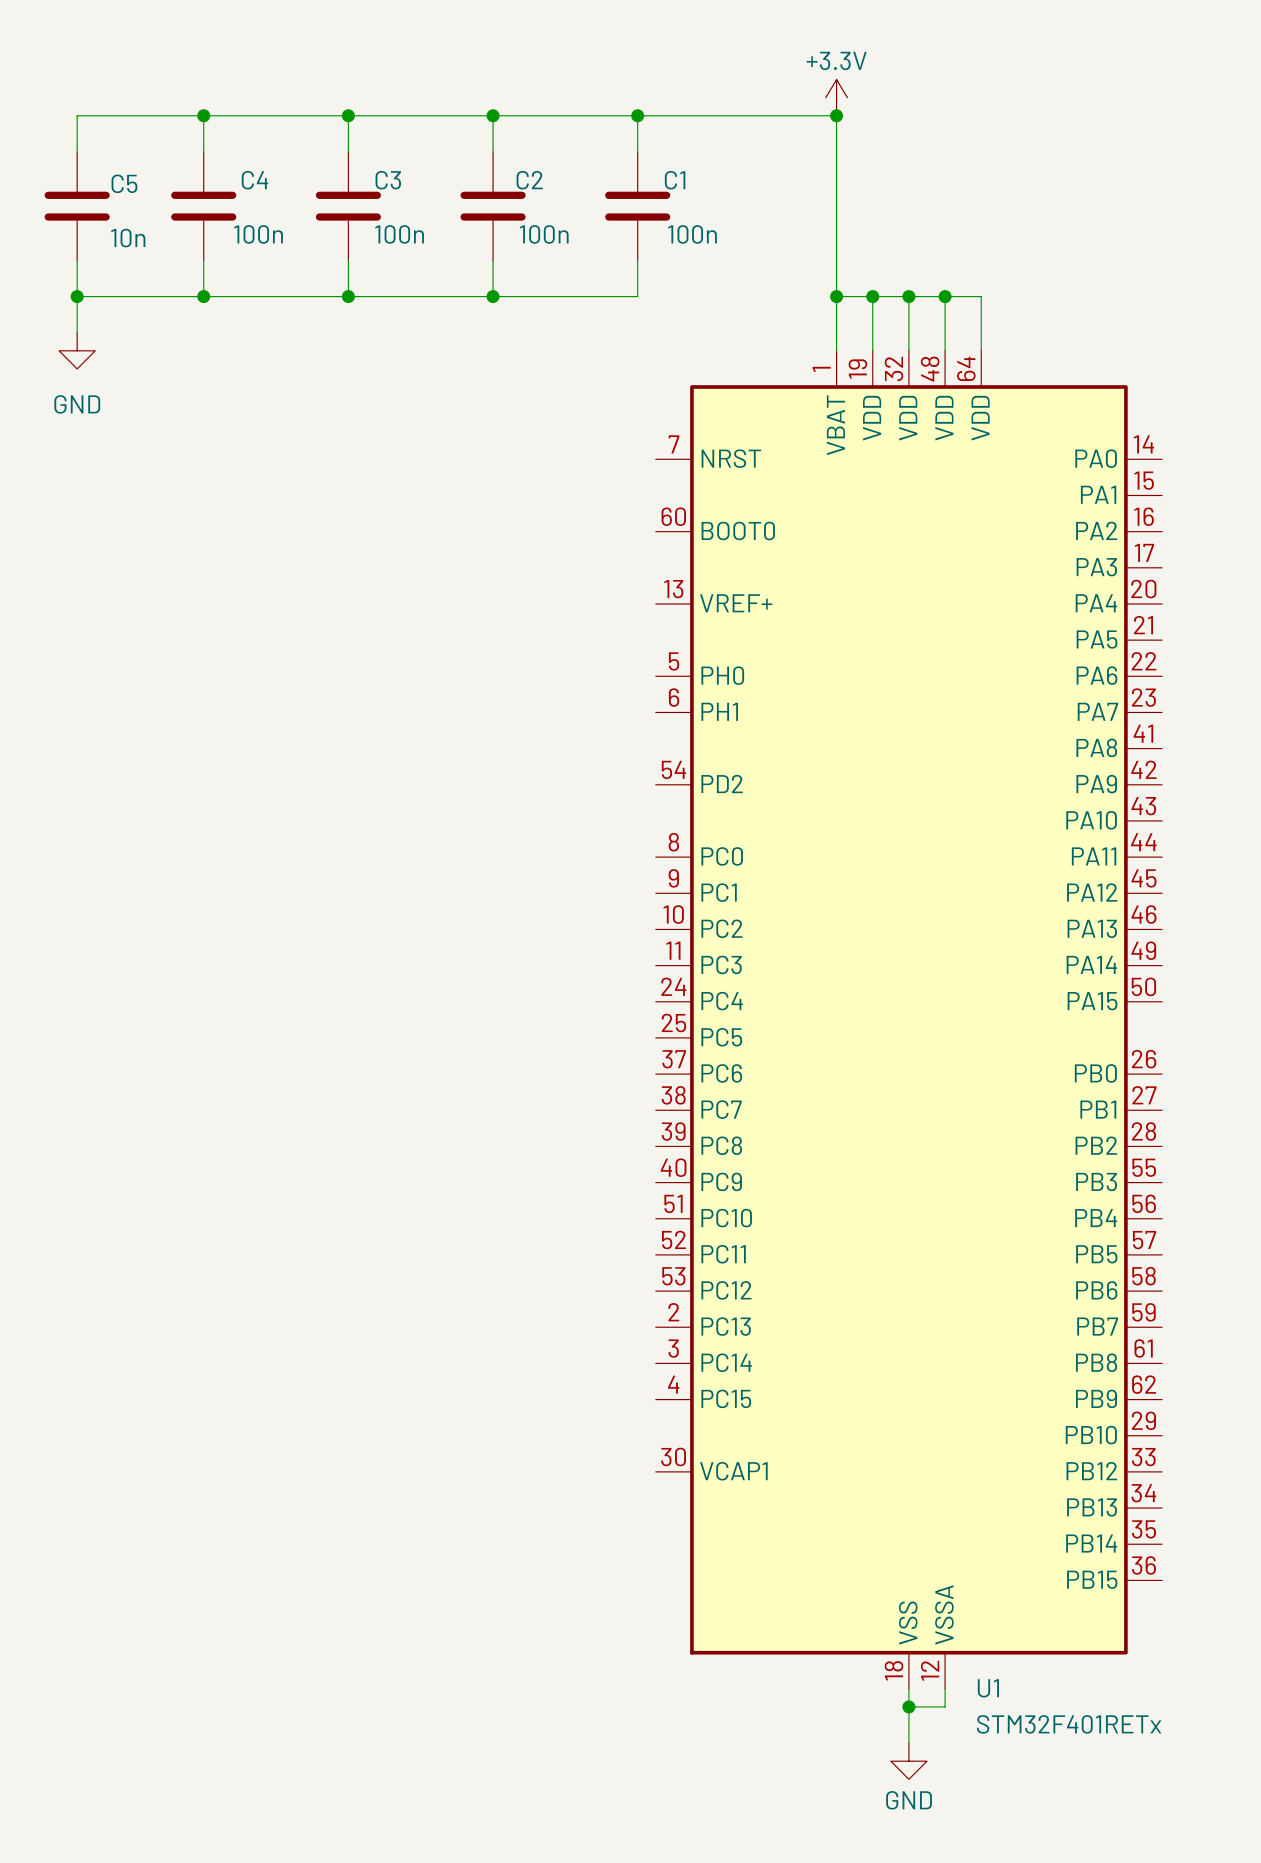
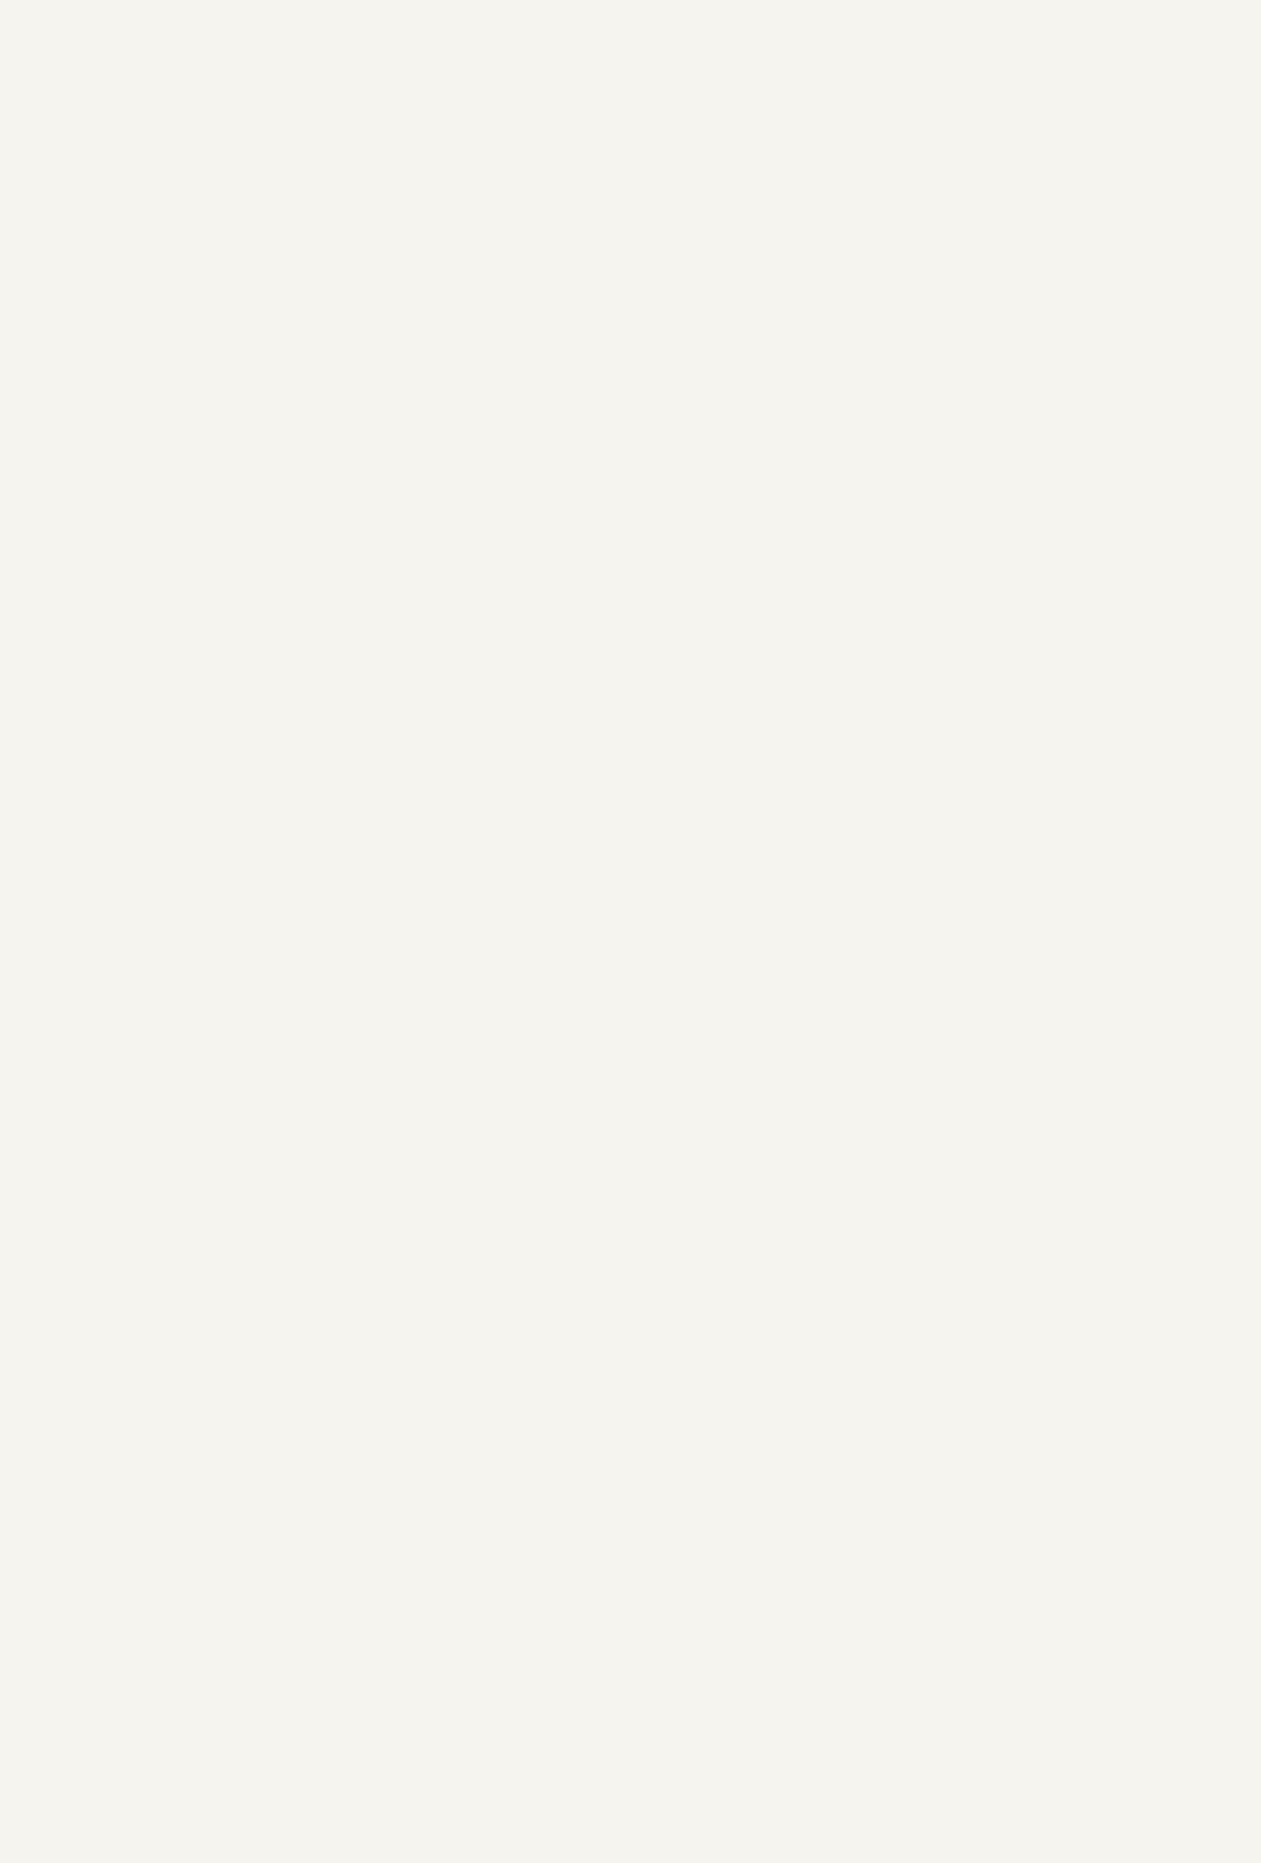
power symbol: +3.3V (836, 97) -> none
wire: (203, 115) (203, 151) -> none
junction: (203, 115) -> none
wire: (348, 115) (348, 151) -> none
junction: (348, 115) -> none
wire: (493, 115) (493, 151) -> none
junction: (493, 115) -> none
wire: (637, 115) (637, 151) -> none
junction: (637, 115) -> none
junction: (836, 115) -> none
wire: (77, 151) (77, 115) (836, 115) (836, 350) -> none
C5: 10n (77, 206) -> none
C4: 100n (203, 206) -> none
C3: 100n (348, 206) -> none
C2: 100n (493, 206) -> none
C1: 100n (637, 206) -> none
wire: (77, 260) (77, 332) -> none
wire: (203, 260) (203, 296) -> none
wire: (348, 260) (348, 296) -> none
wire: (493, 260) (493, 296) -> none
wire: (637, 260) (637, 296) (77, 296) -> none
junction: (77, 296) -> none
junction: (203, 296) -> none
junction: (348, 296) -> none
junction: (493, 296) -> none
wire: (836, 296) (981, 296) (981, 350) -> none
junction: (836, 296) -> none
wire: (872, 296) (872, 350) -> none
junction: (872, 296) -> none
wire: (908, 296) (908, 350) -> none
junction: (908, 296) -> none
wire: (945, 296) (945, 350) -> none
junction: (945, 296) -> none
power symbol: GND (77, 350) -> none
U1: STM32F401RETx (908, 1019) -> none
wire: (908, 1688) (908, 1743) -> none
wire: (945, 1688) (945, 1706) (908, 1706) -> none
junction: (908, 1706) -> none
power symbol: GND (908, 1761) -> none

